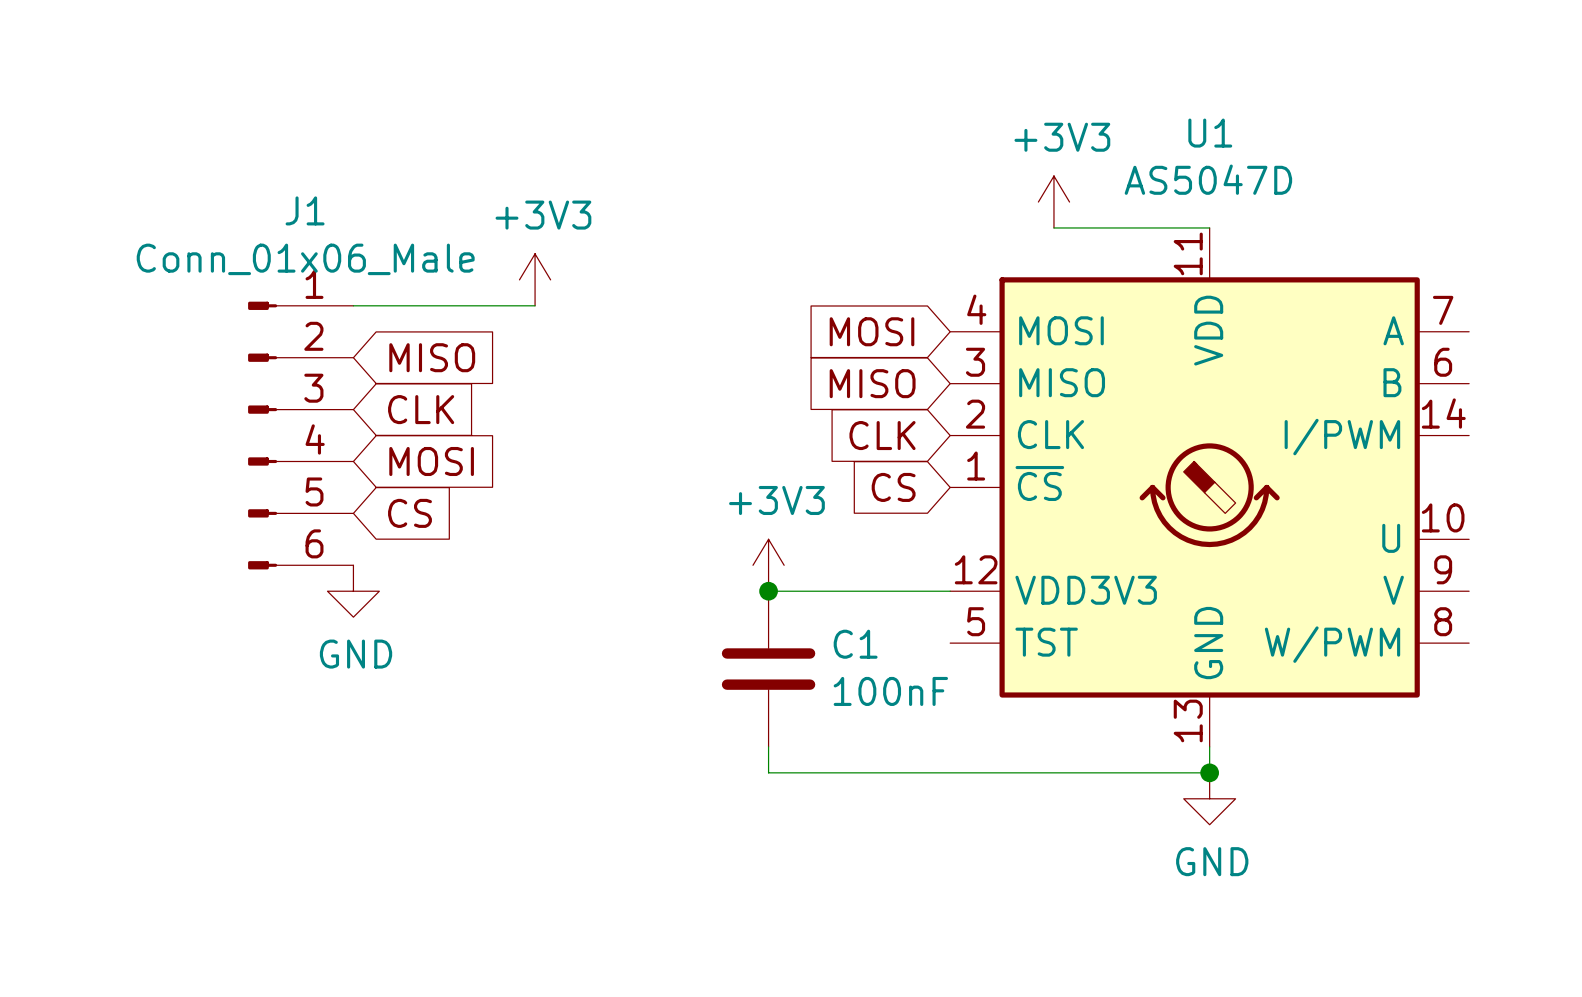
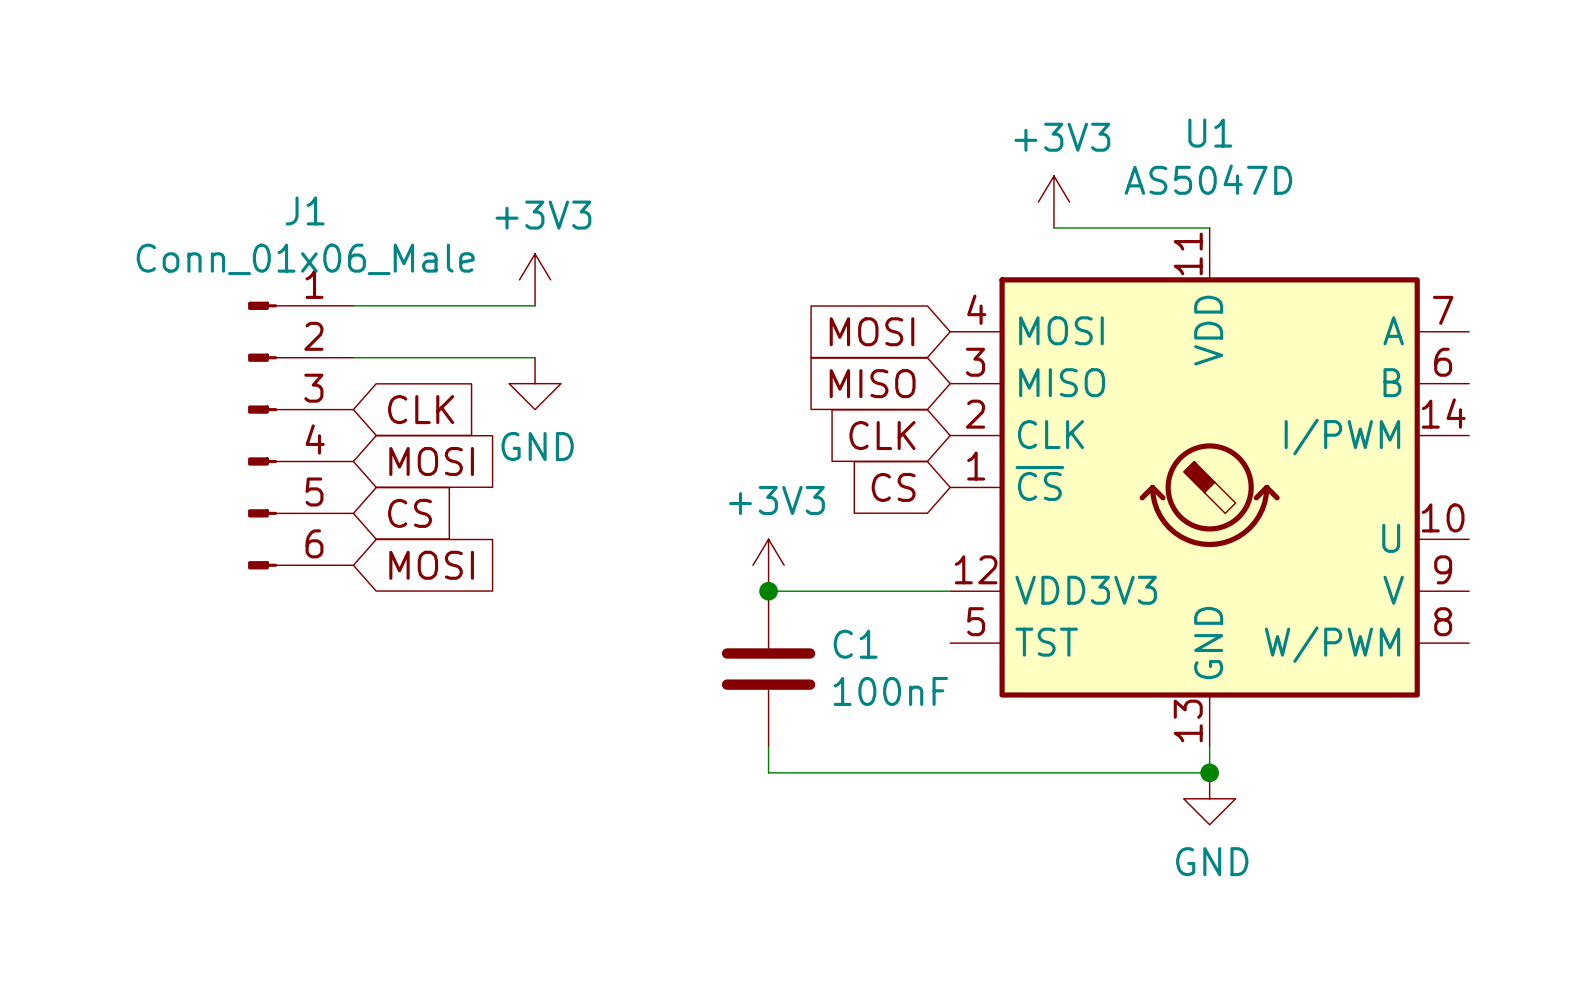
wire: none -> (353, 357) (535, 357)
global label: MISO (432, 357) -> none
global label: none -> MOSI (431, 565)
power symbol position: GND (353, 591) -> GND (535, 383)

